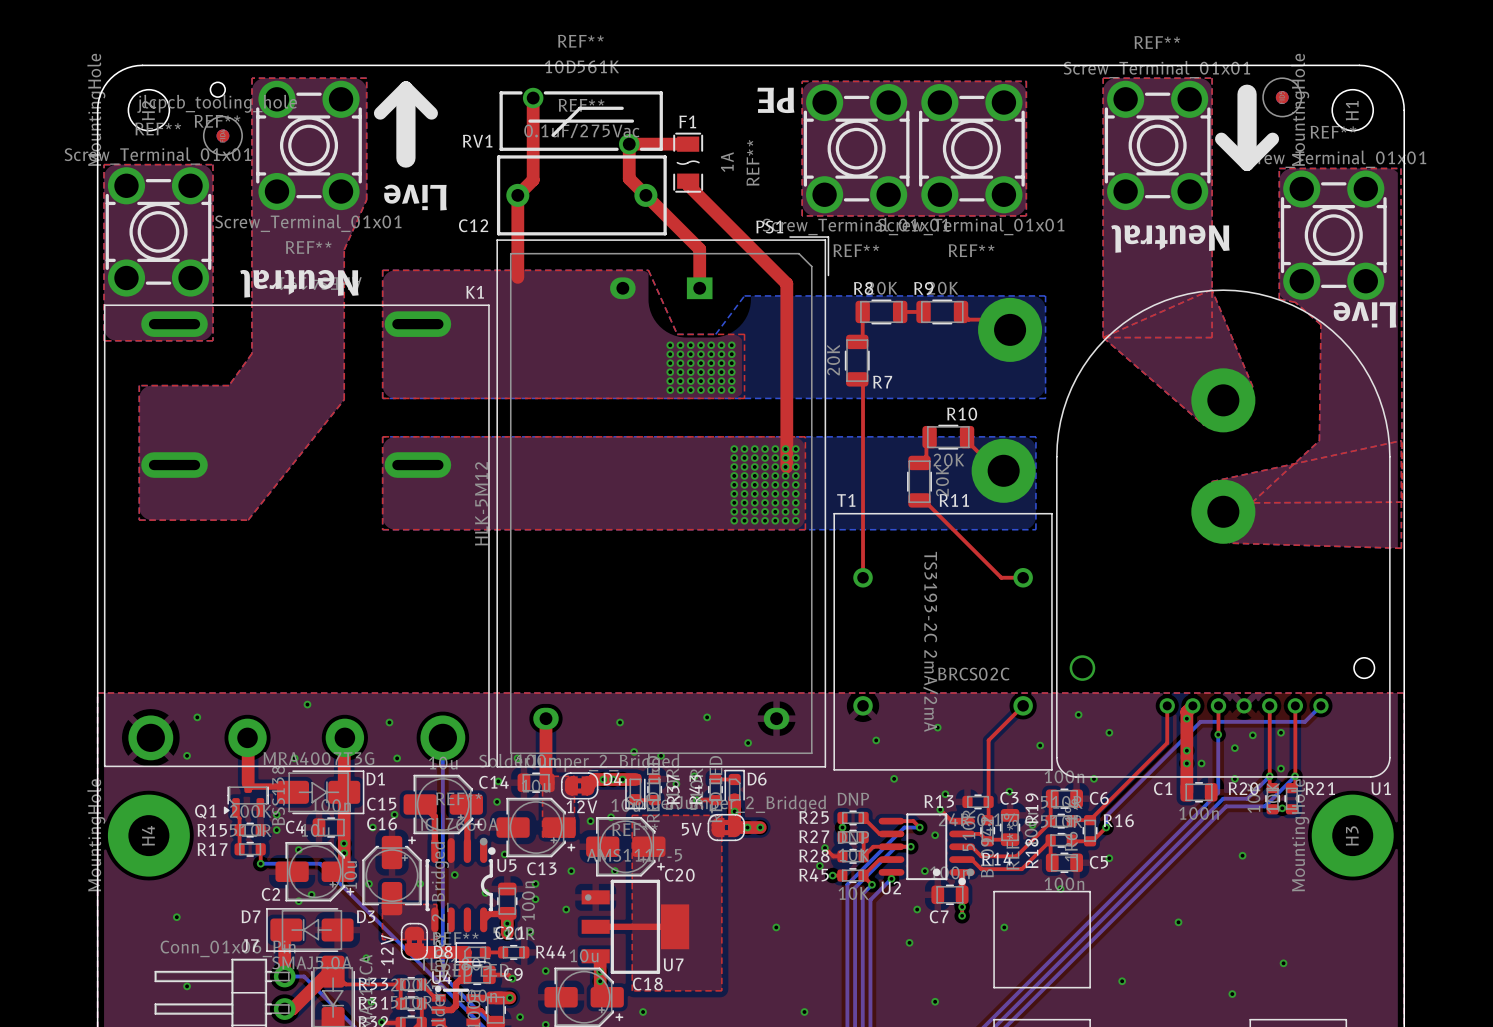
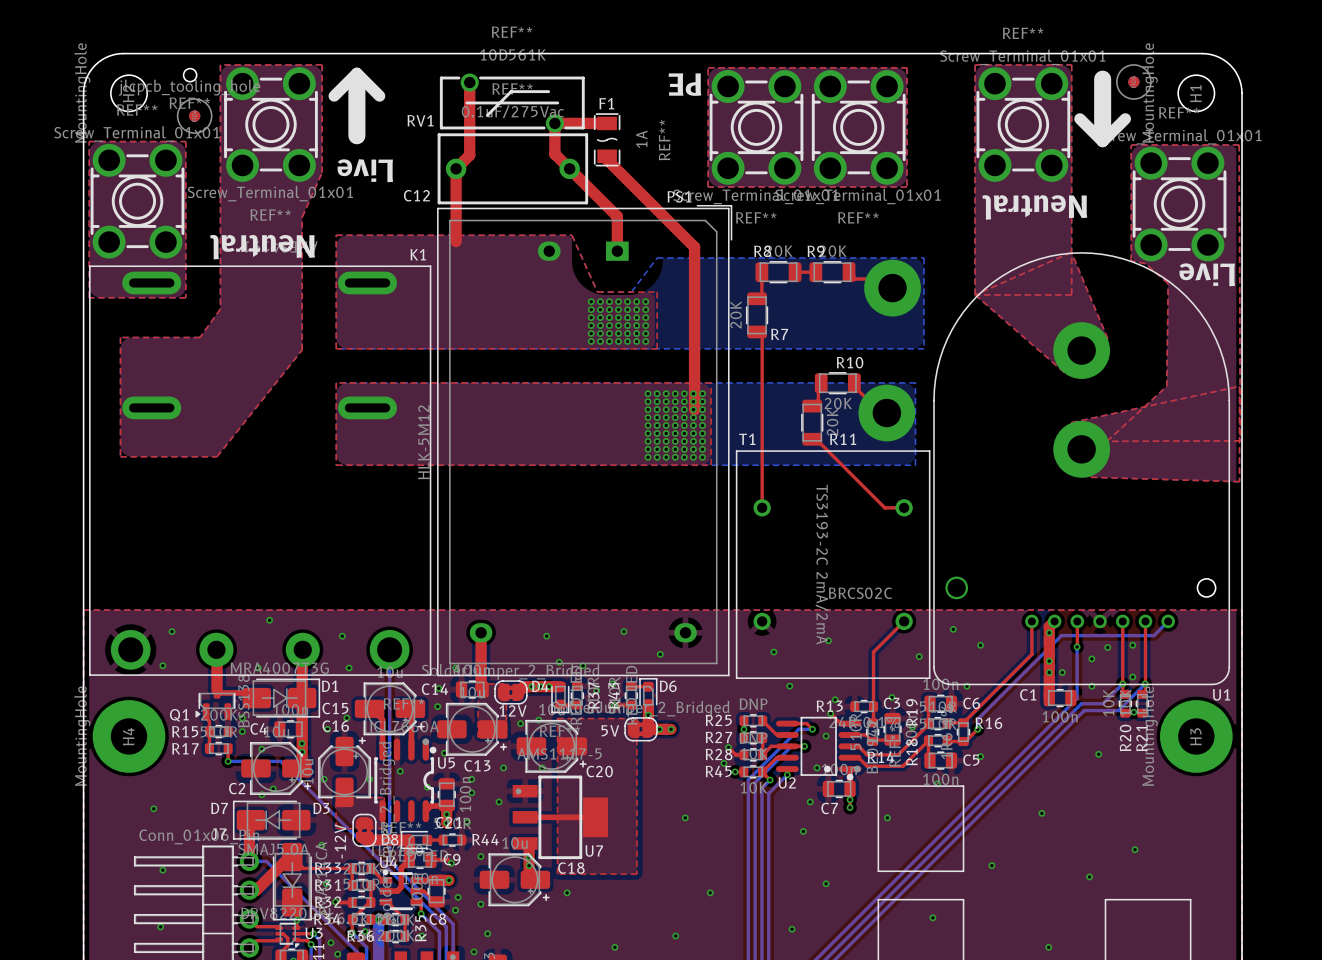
R20 name rotation: 0° (1243, 788) -> 90° counterclockwise (1125, 737)
R20 name position: R20 (1243, 788) -> R20 (1125, 737)
R21 name rotation: 0° (1320, 788) -> 90° counterclockwise (1141, 738)
R21 name position: R21 (1320, 788) -> R21 (1141, 738)

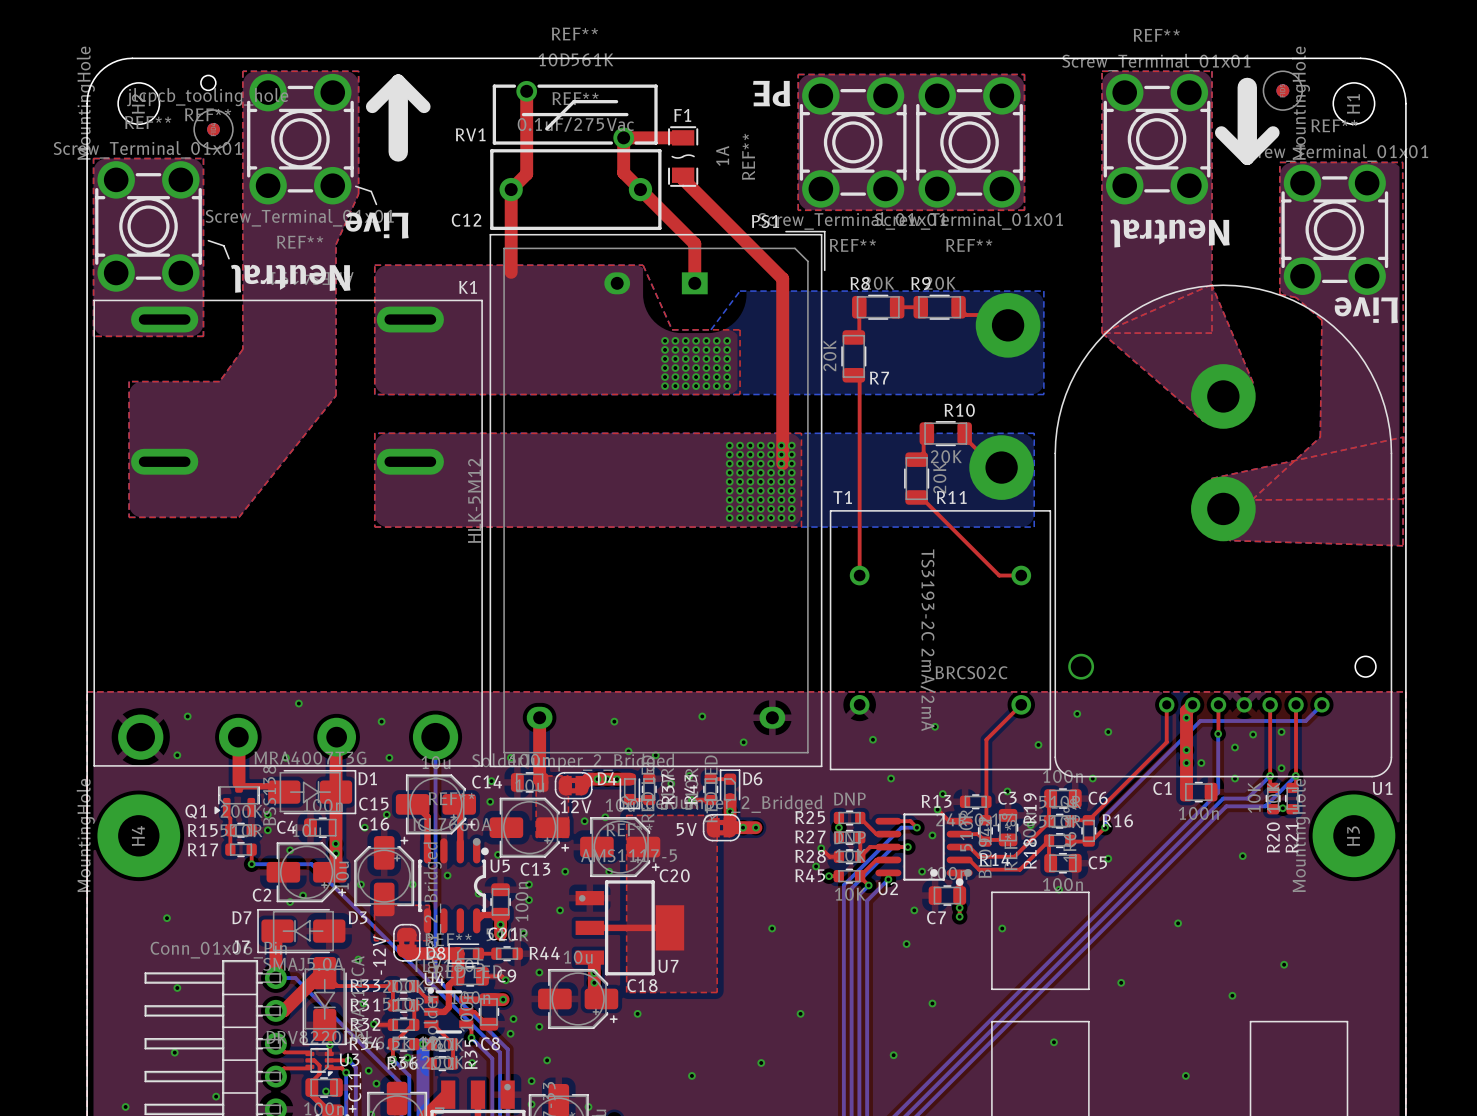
line: none -> (355, 186) (371, 191) (376, 204)
text position: Live (365, 170) -> Live (377, 225)
line: none -> (208, 240) (223, 245) (229, 258)

